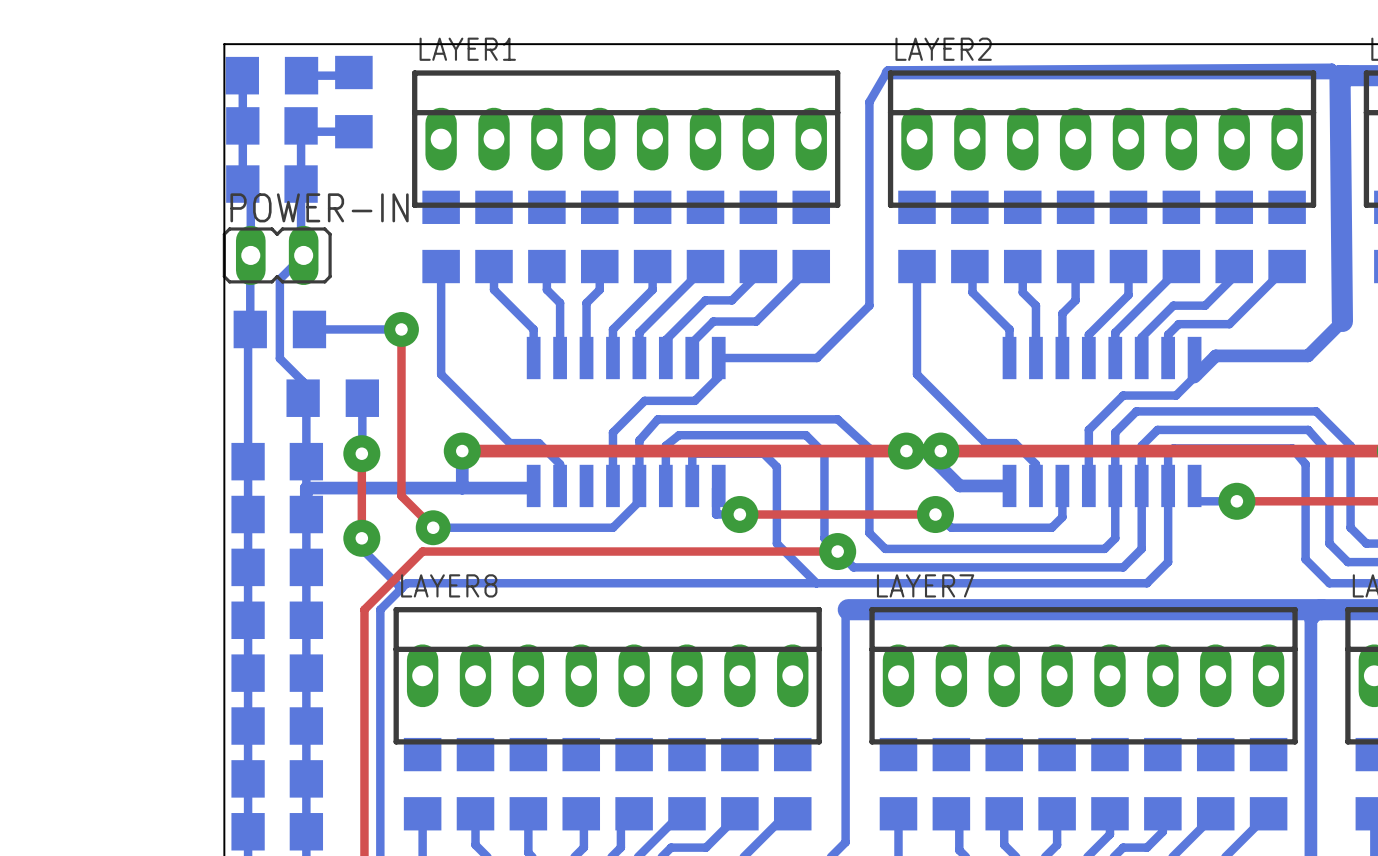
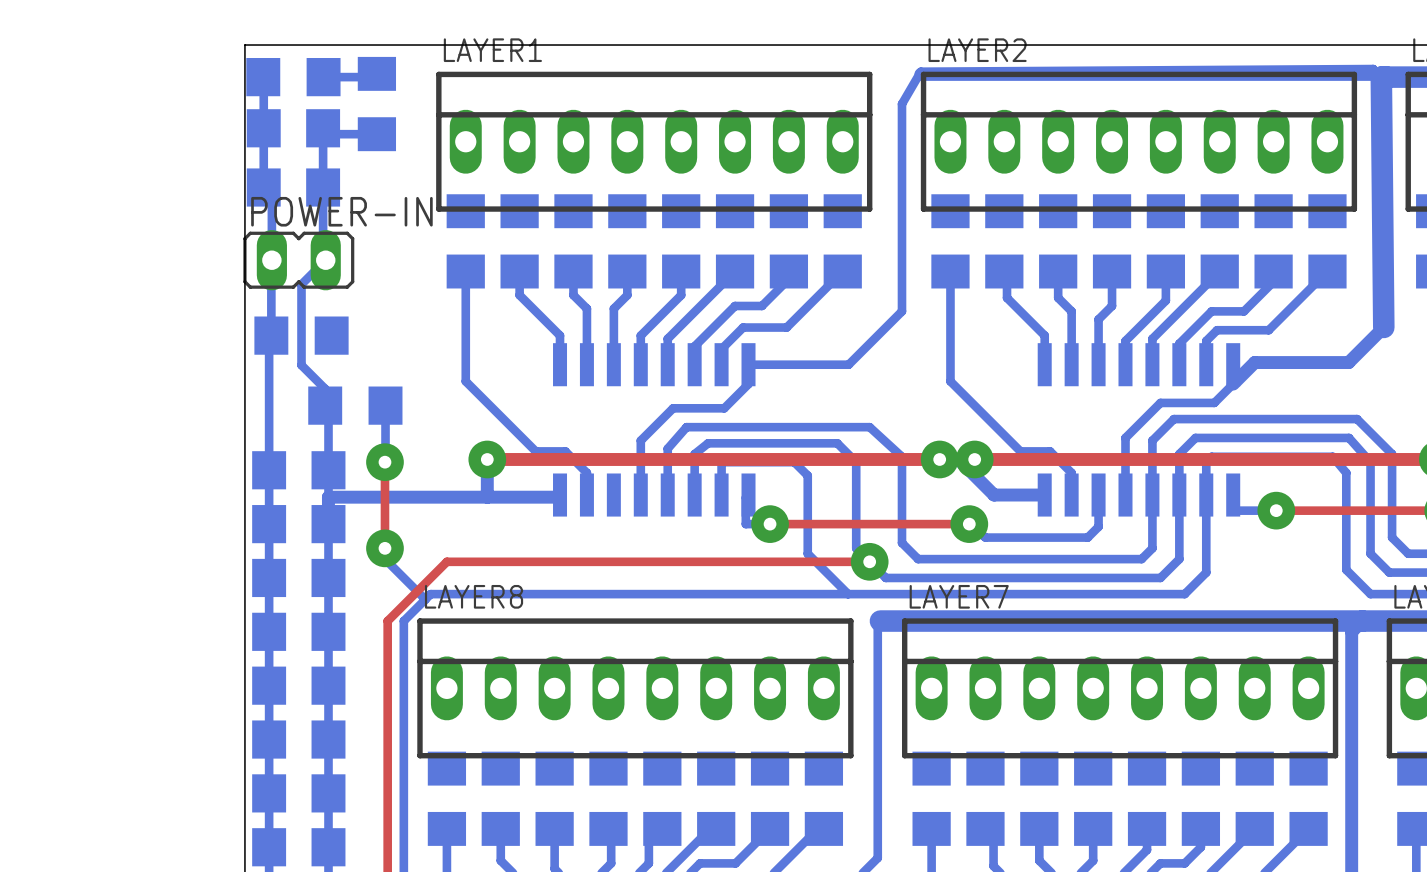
bottom track: (309, 329) (401, 329) -> none
top track: (401, 329) (401, 496) (433, 527) -> none
via: (401, 329) -> none
bottom track: (639, 485) (639, 501) (612, 527) (433, 527) -> none
via: (433, 527) -> none

